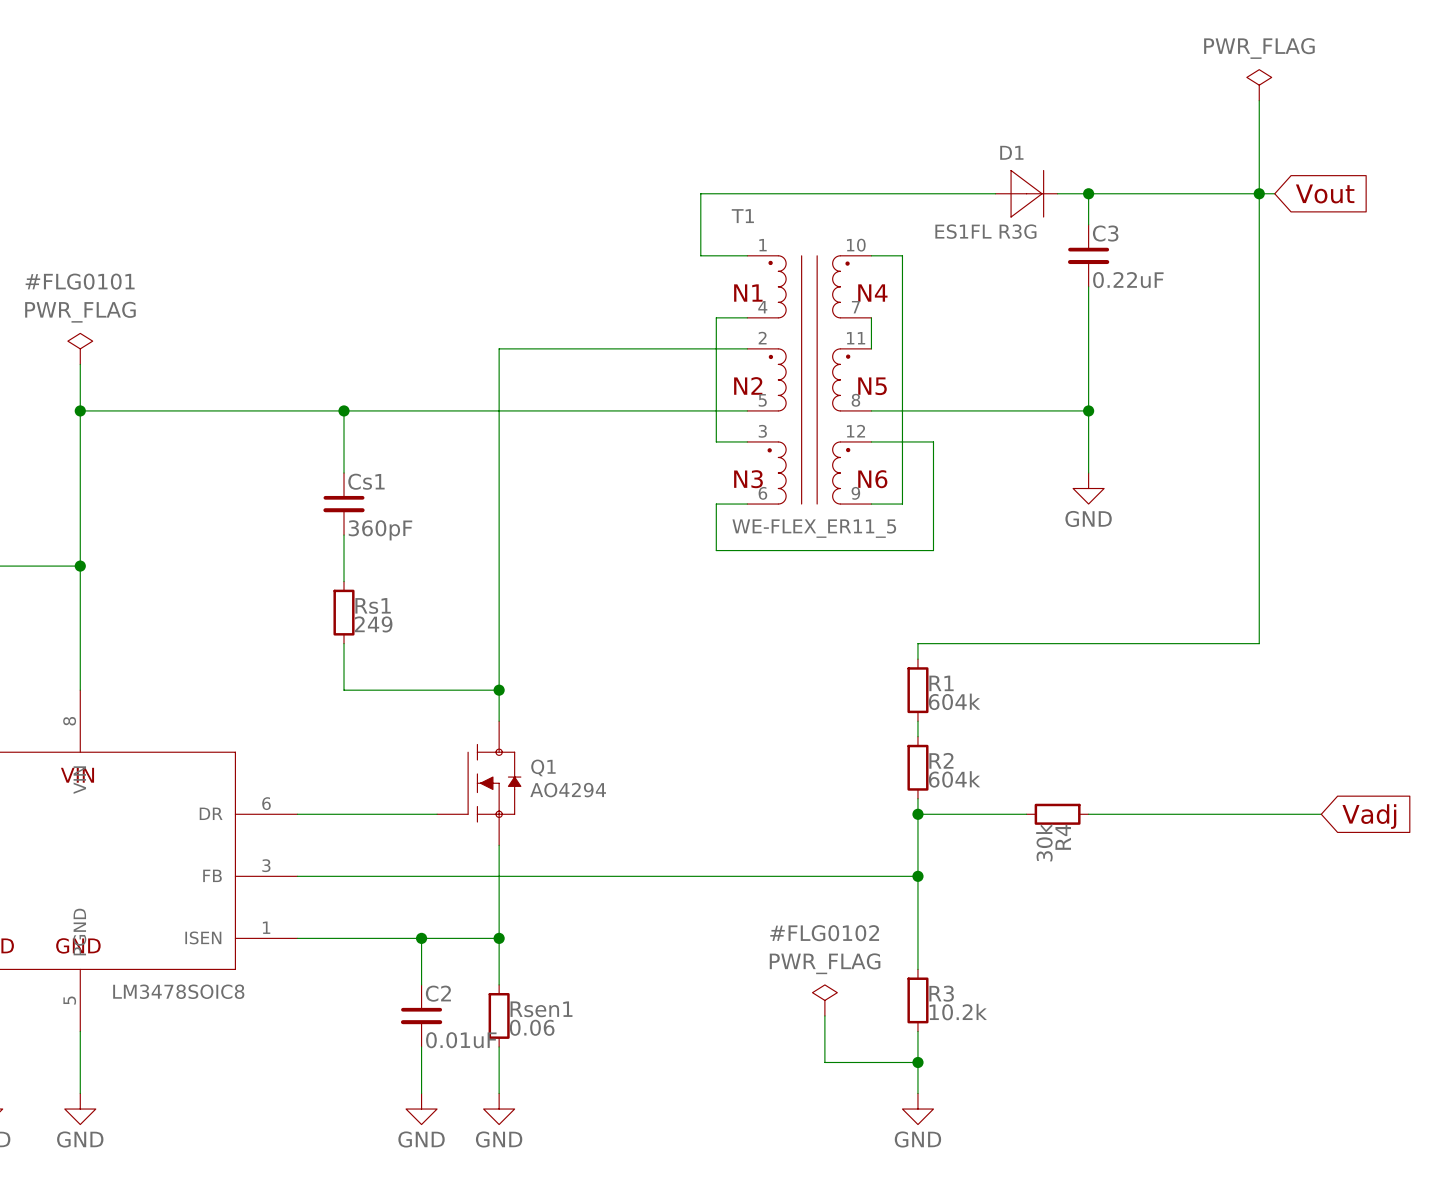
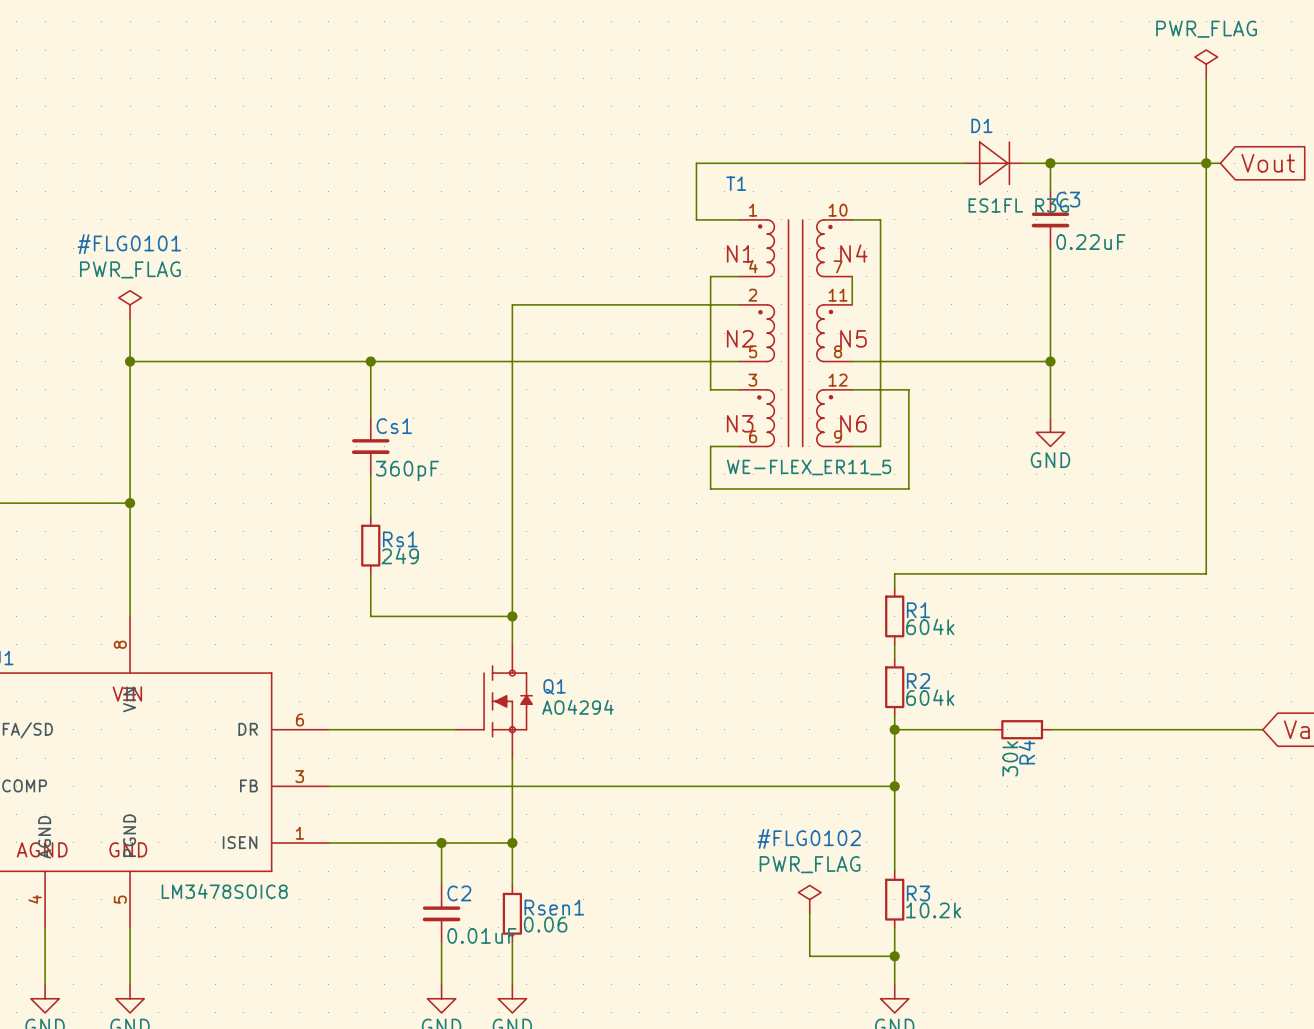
D1 value position: ES1FL R3G (985, 231) -> ES1FL R3G (1018, 205)

